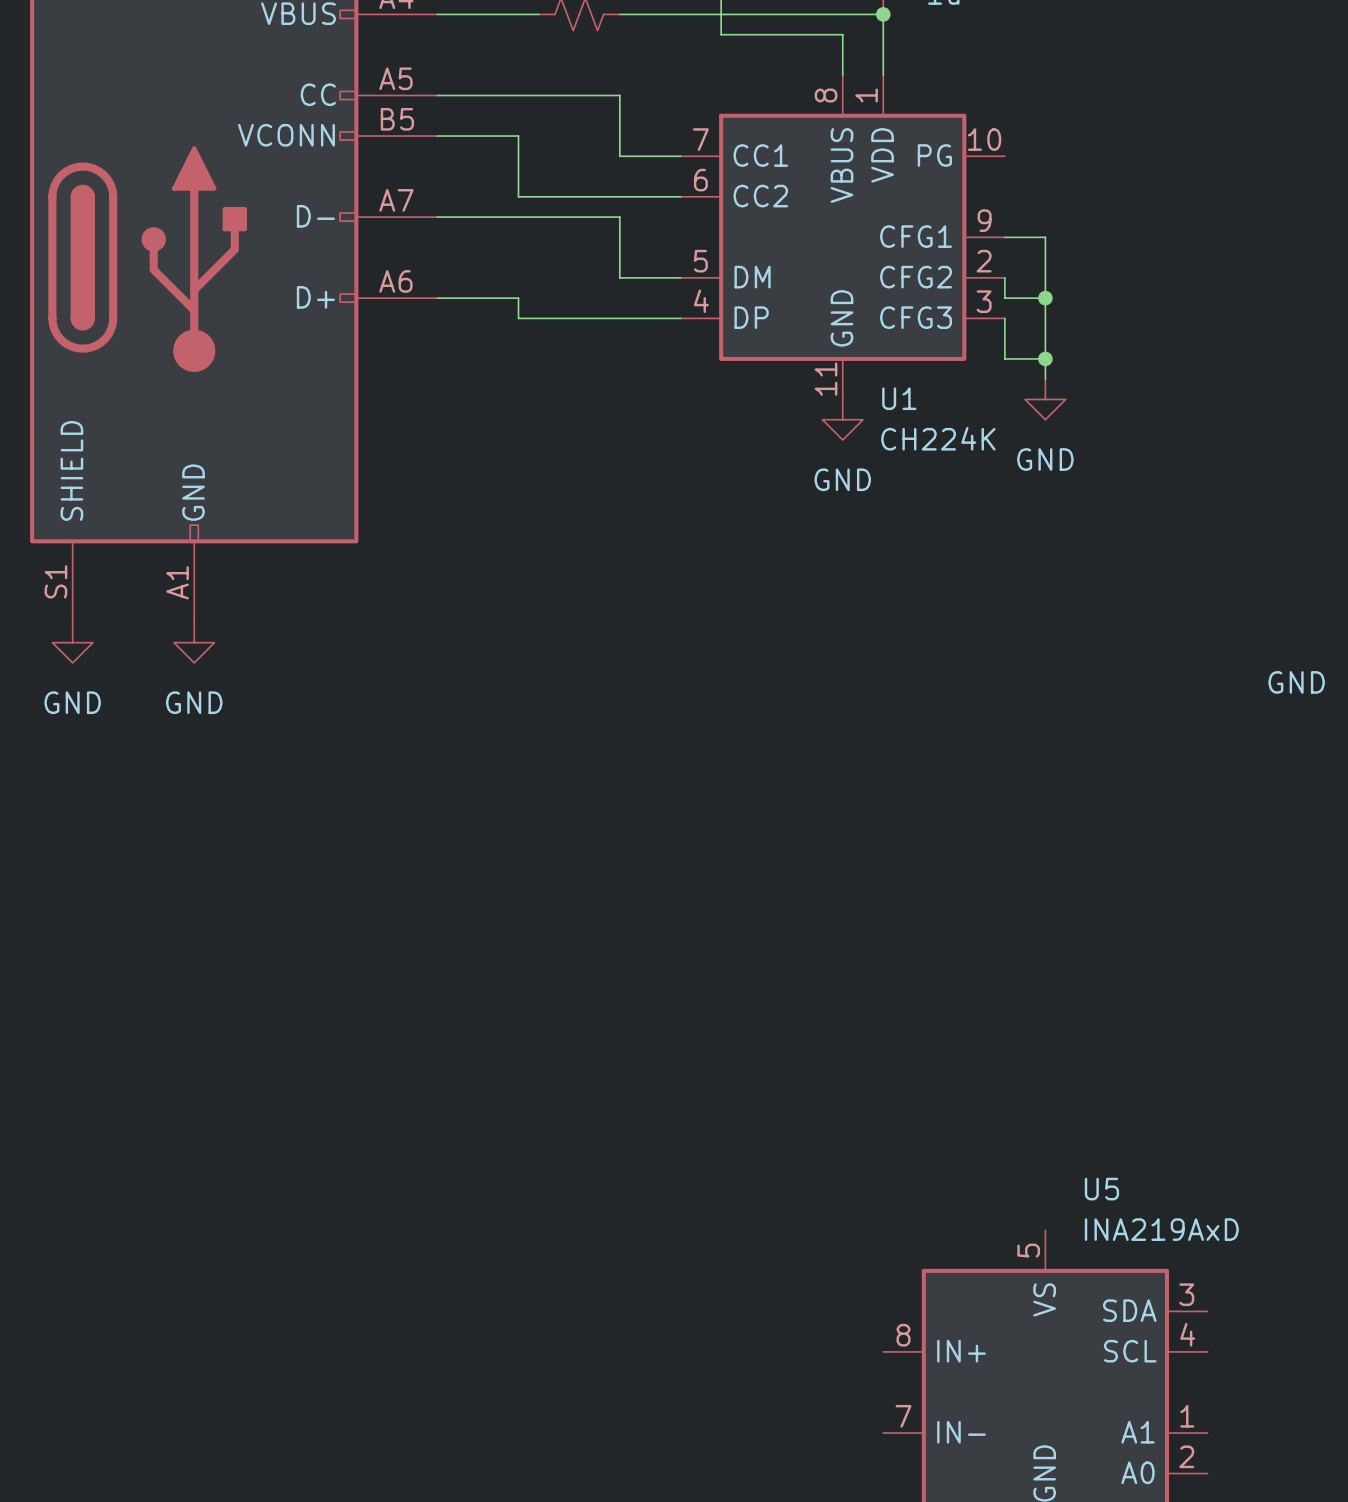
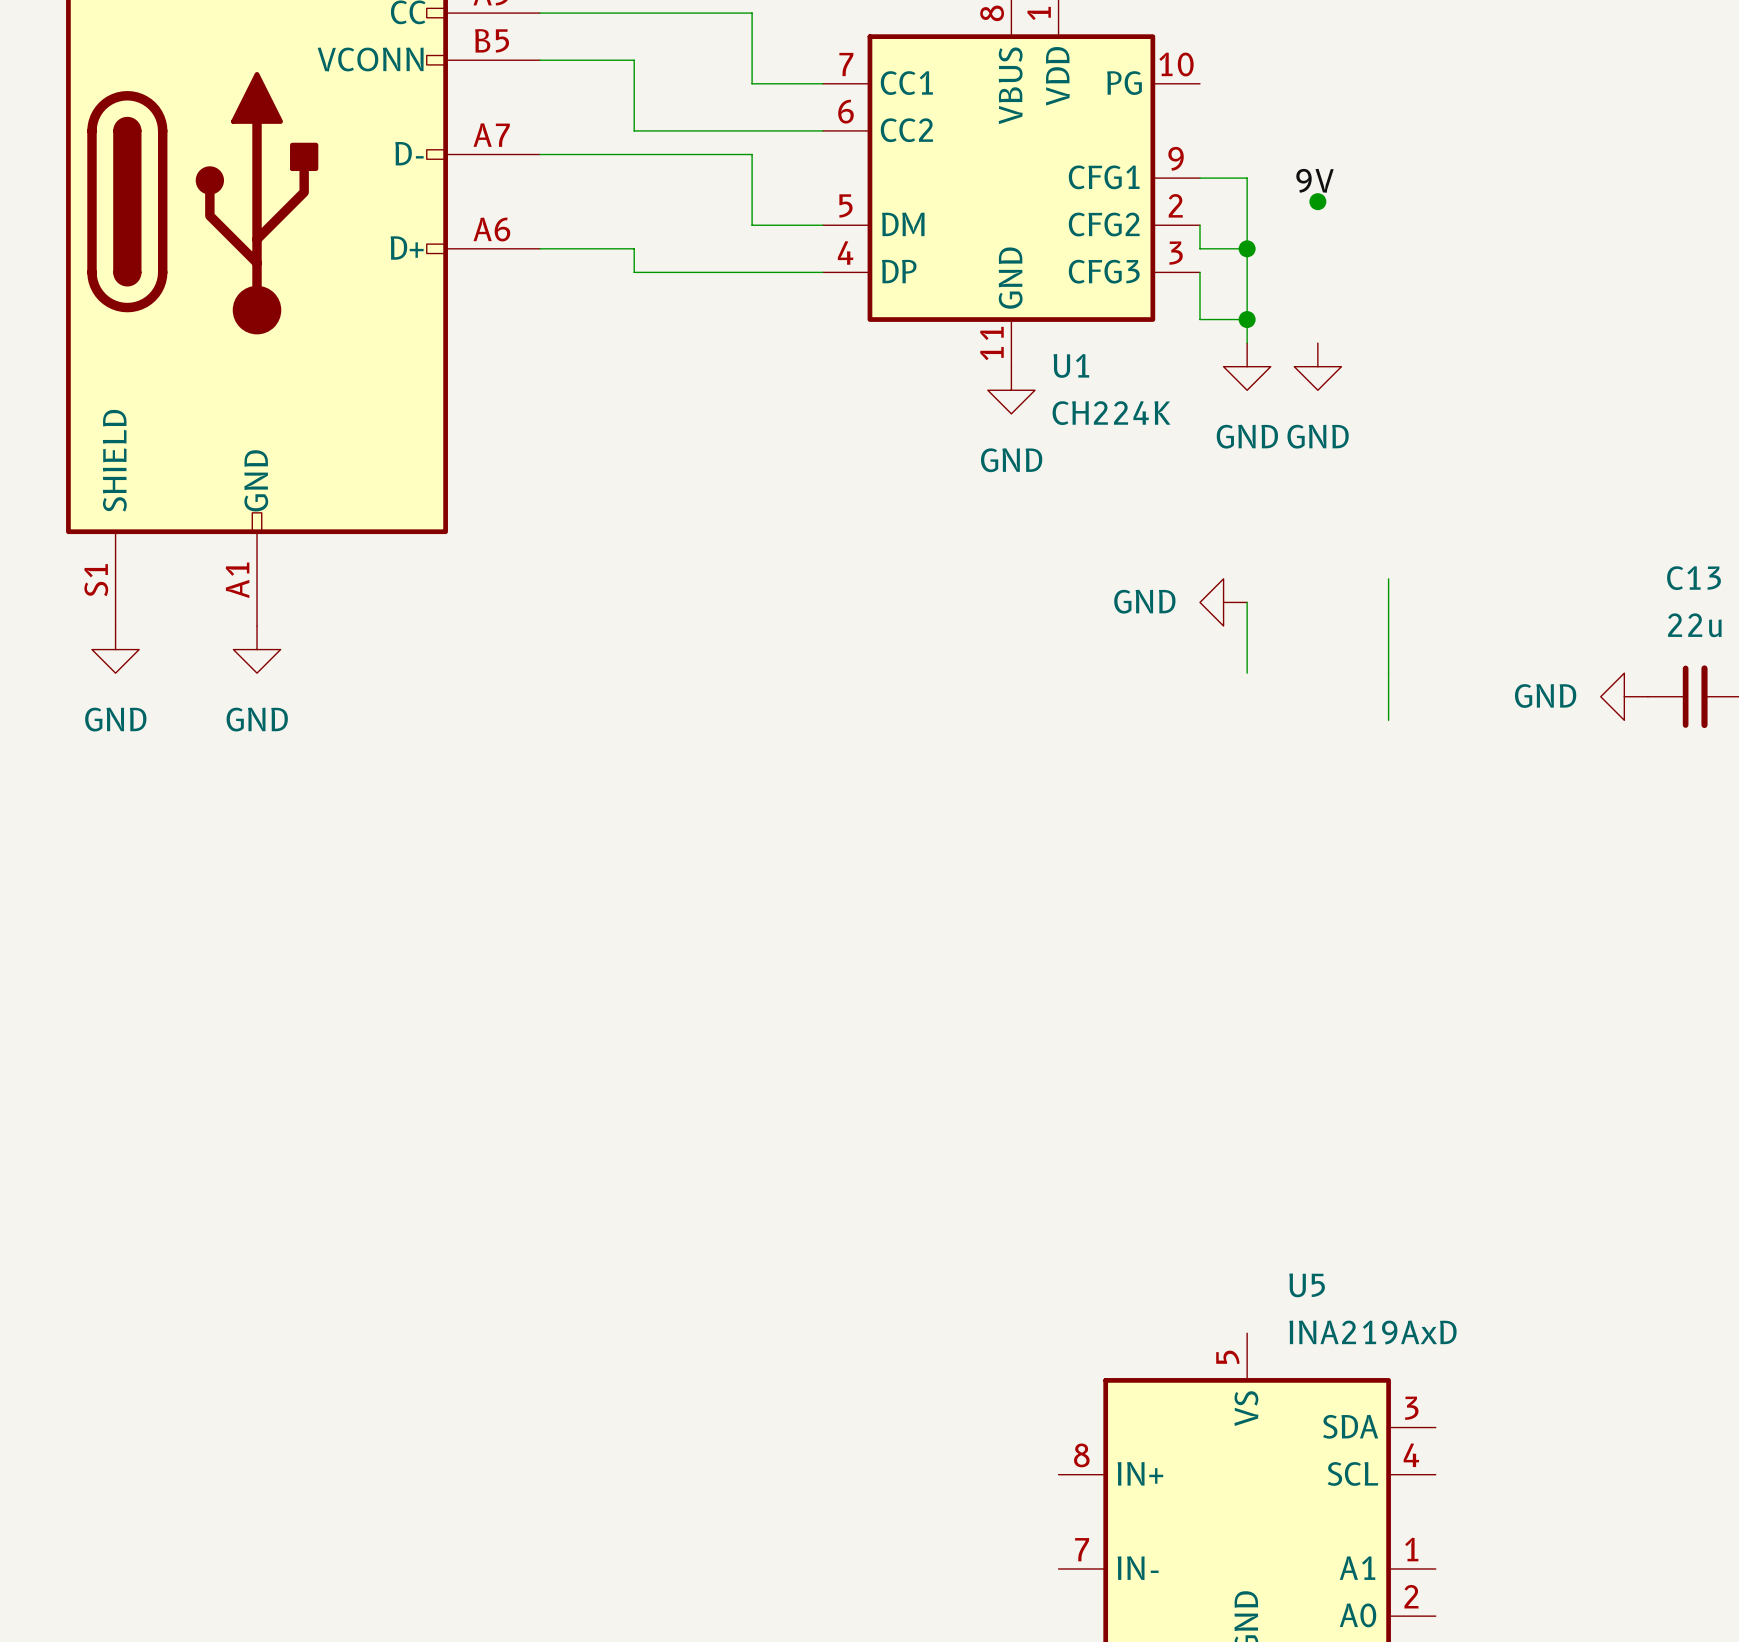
label: none -> 9V (1314, 180)
junction: none -> (1317, 201)
power symbol: none -> GND (1317, 366)
wire: none -> (1388, 578) (1388, 720)
power symbol: none -> GND (1223, 602)
wire: none -> (1247, 602) (1247, 673)

